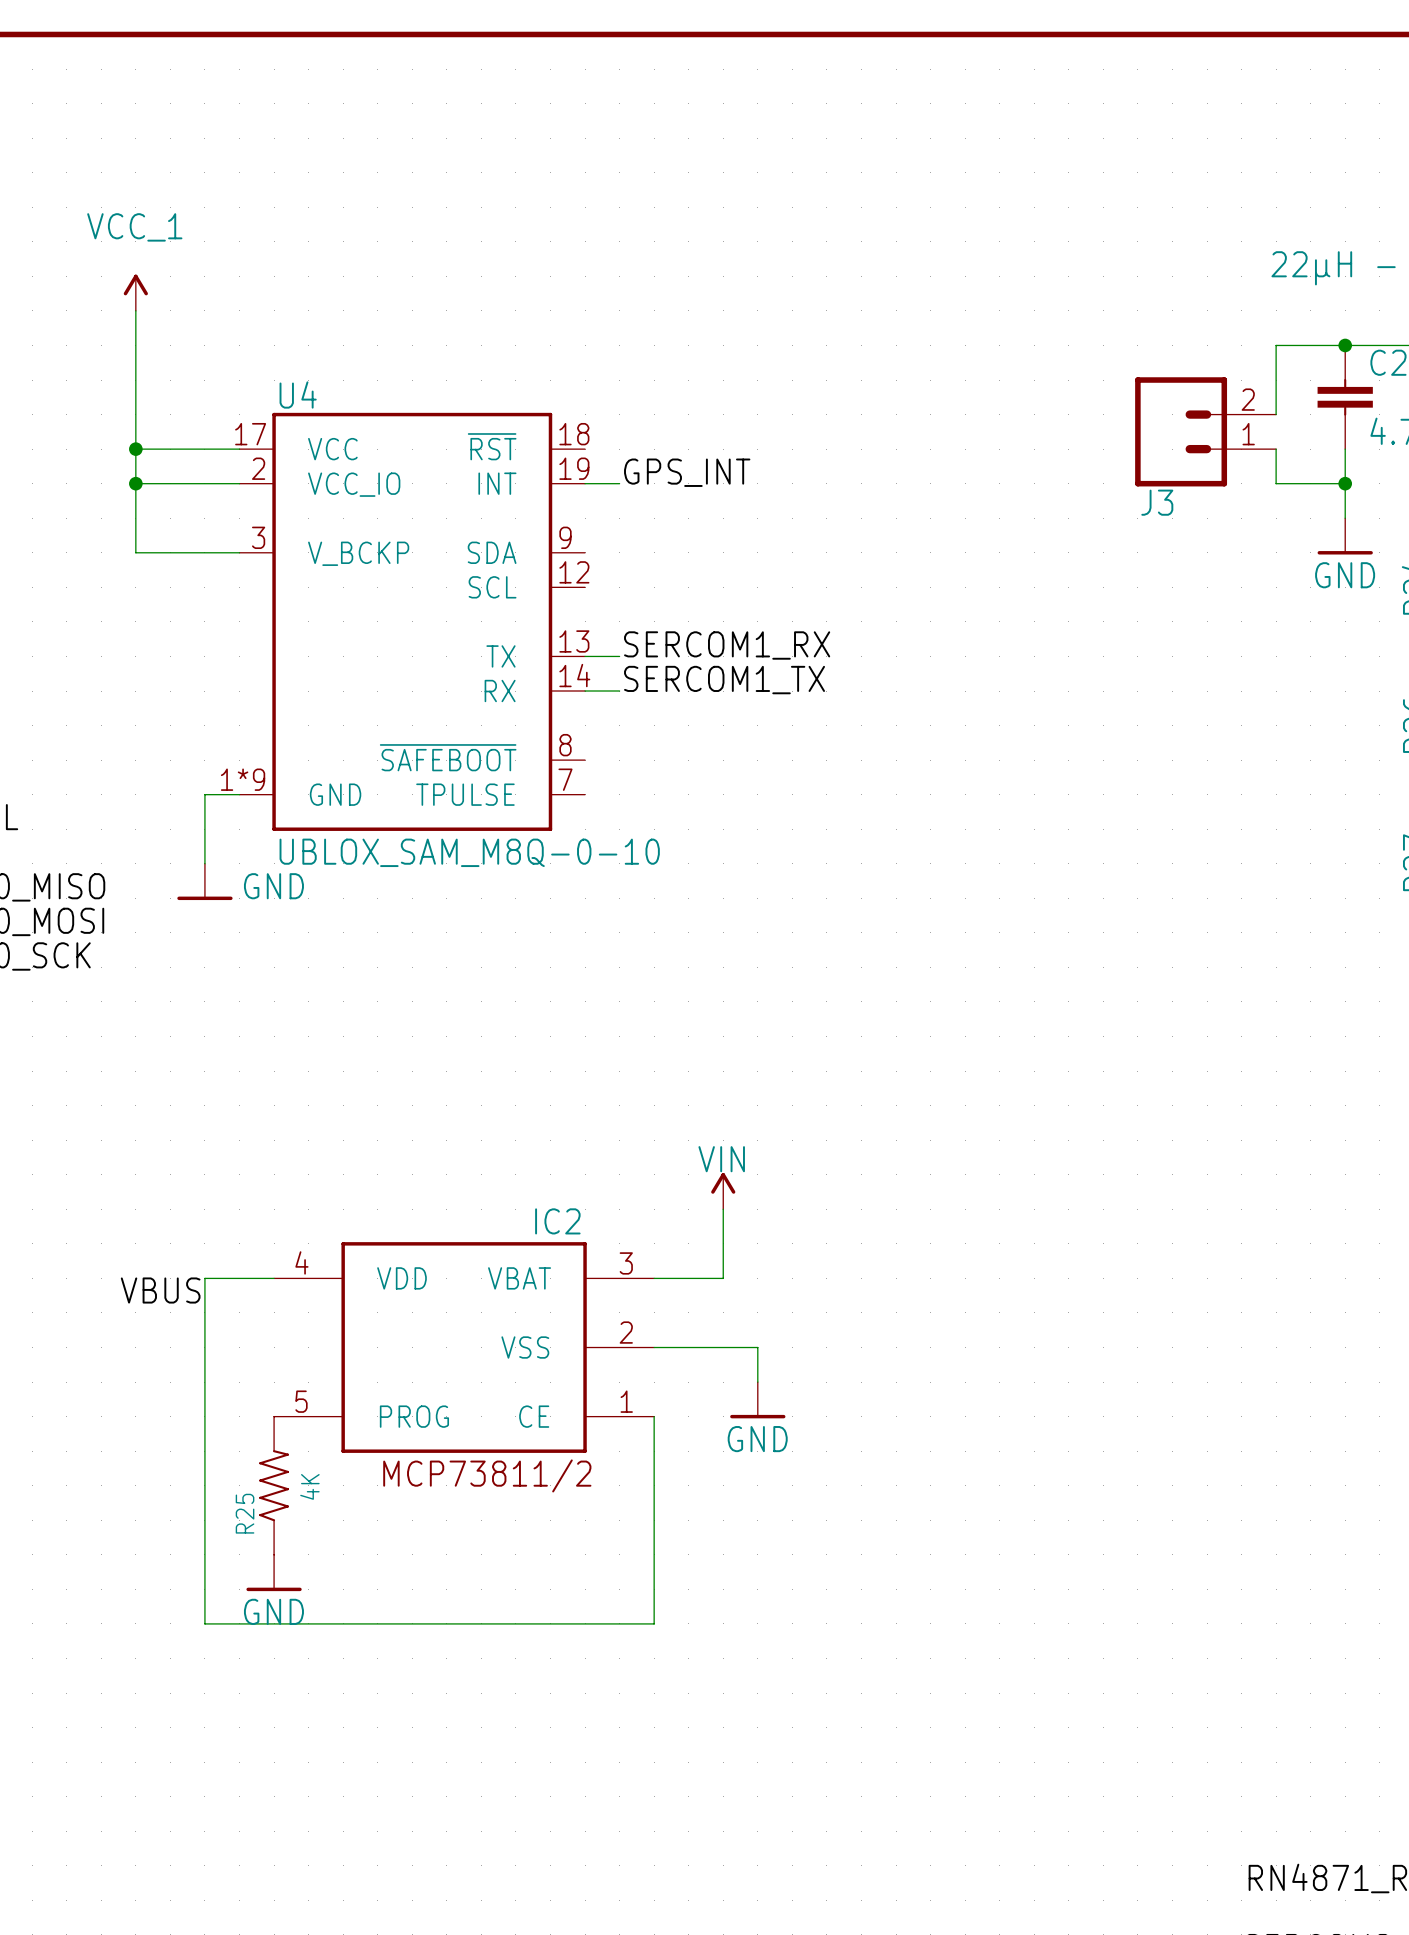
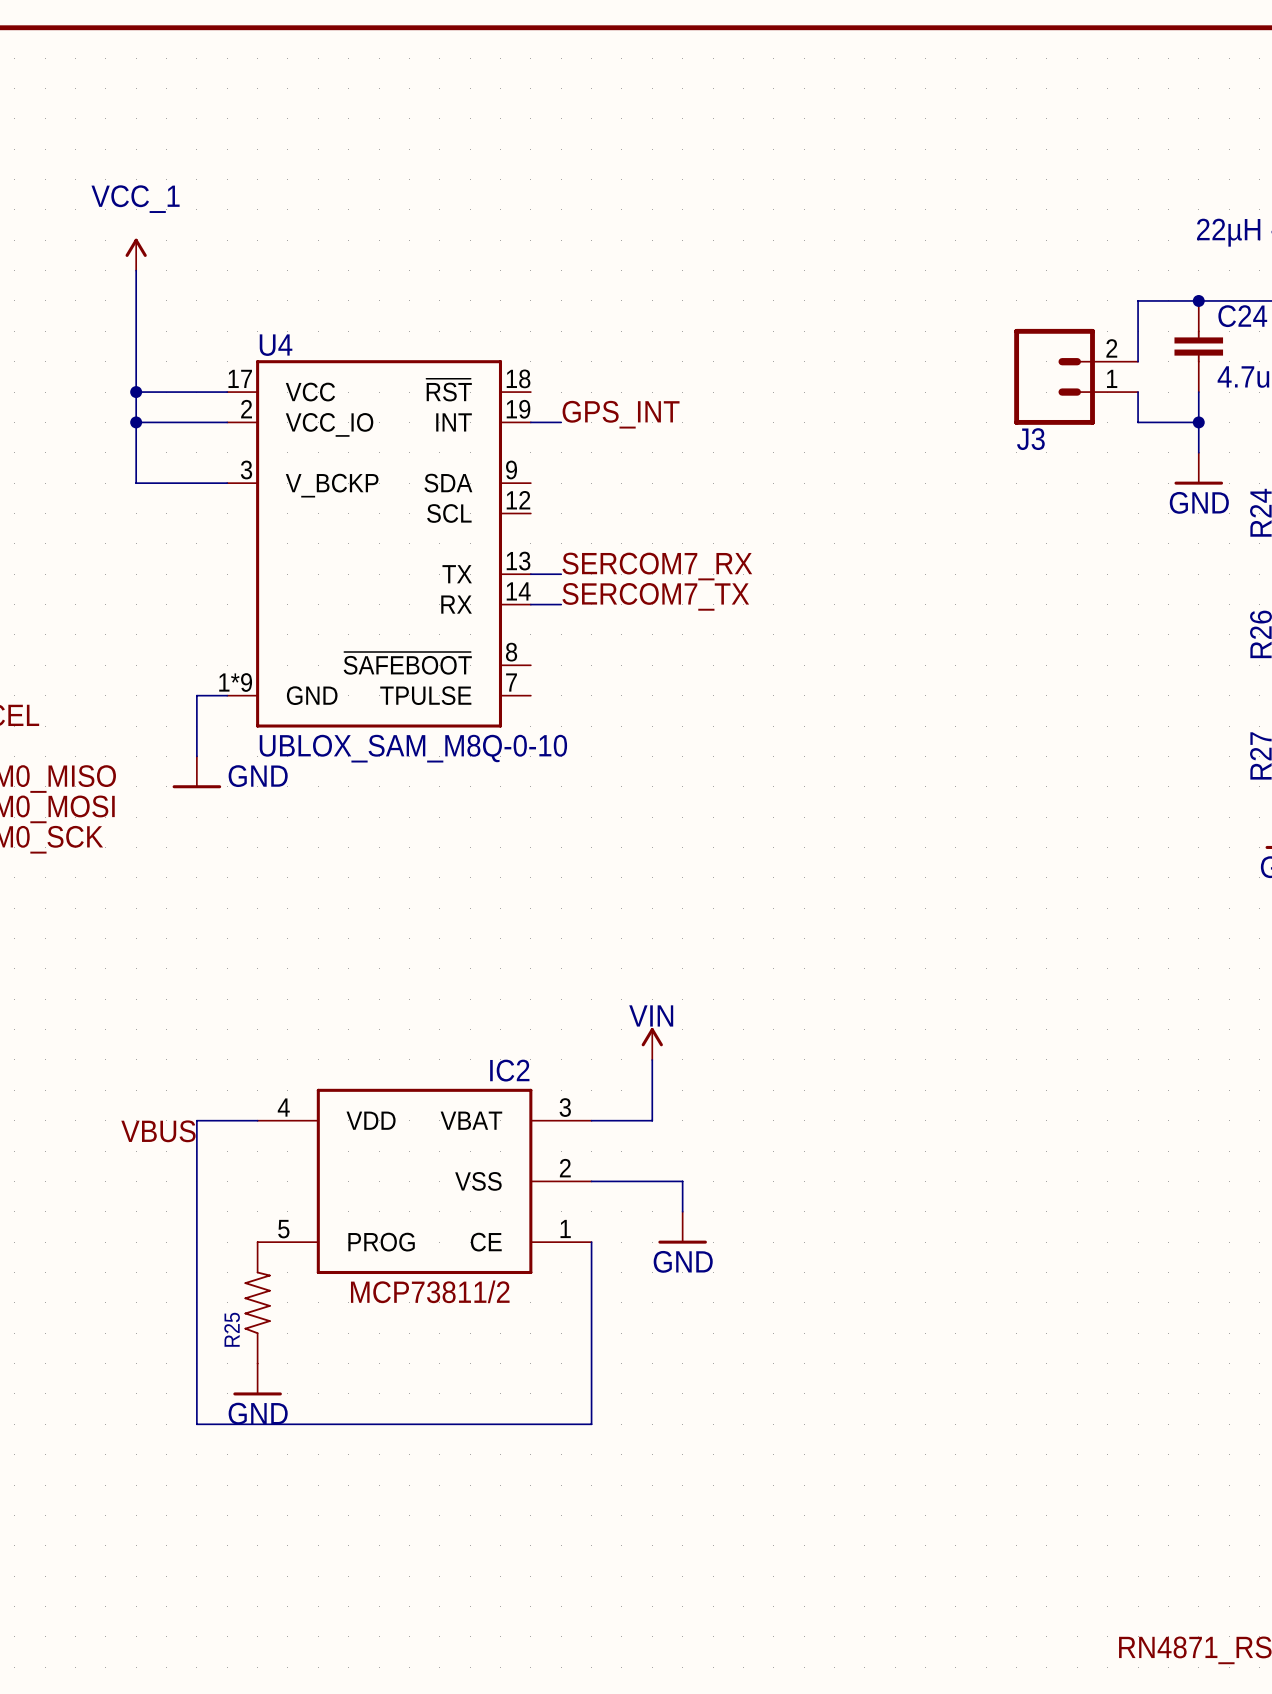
label: SERCOM1_RX (727, 645) -> SERCOM7_RX (657, 566)
label: SERCOM1_TX (724, 680) -> SERCOM7_TX (655, 596)
R25 value: 4K (309, 1486) -> none

